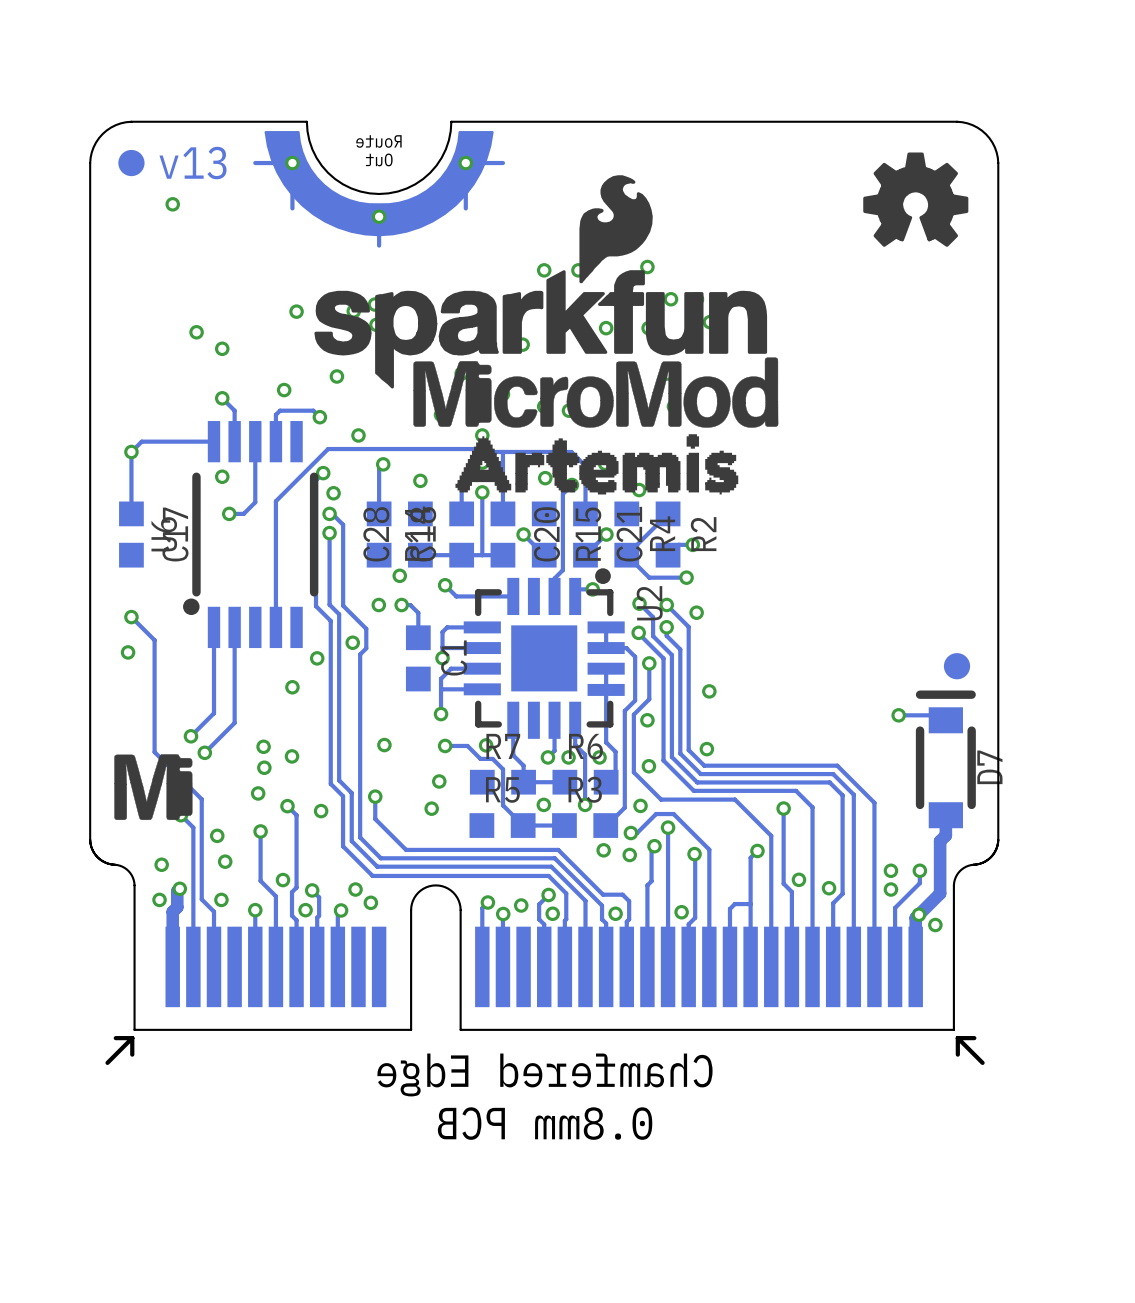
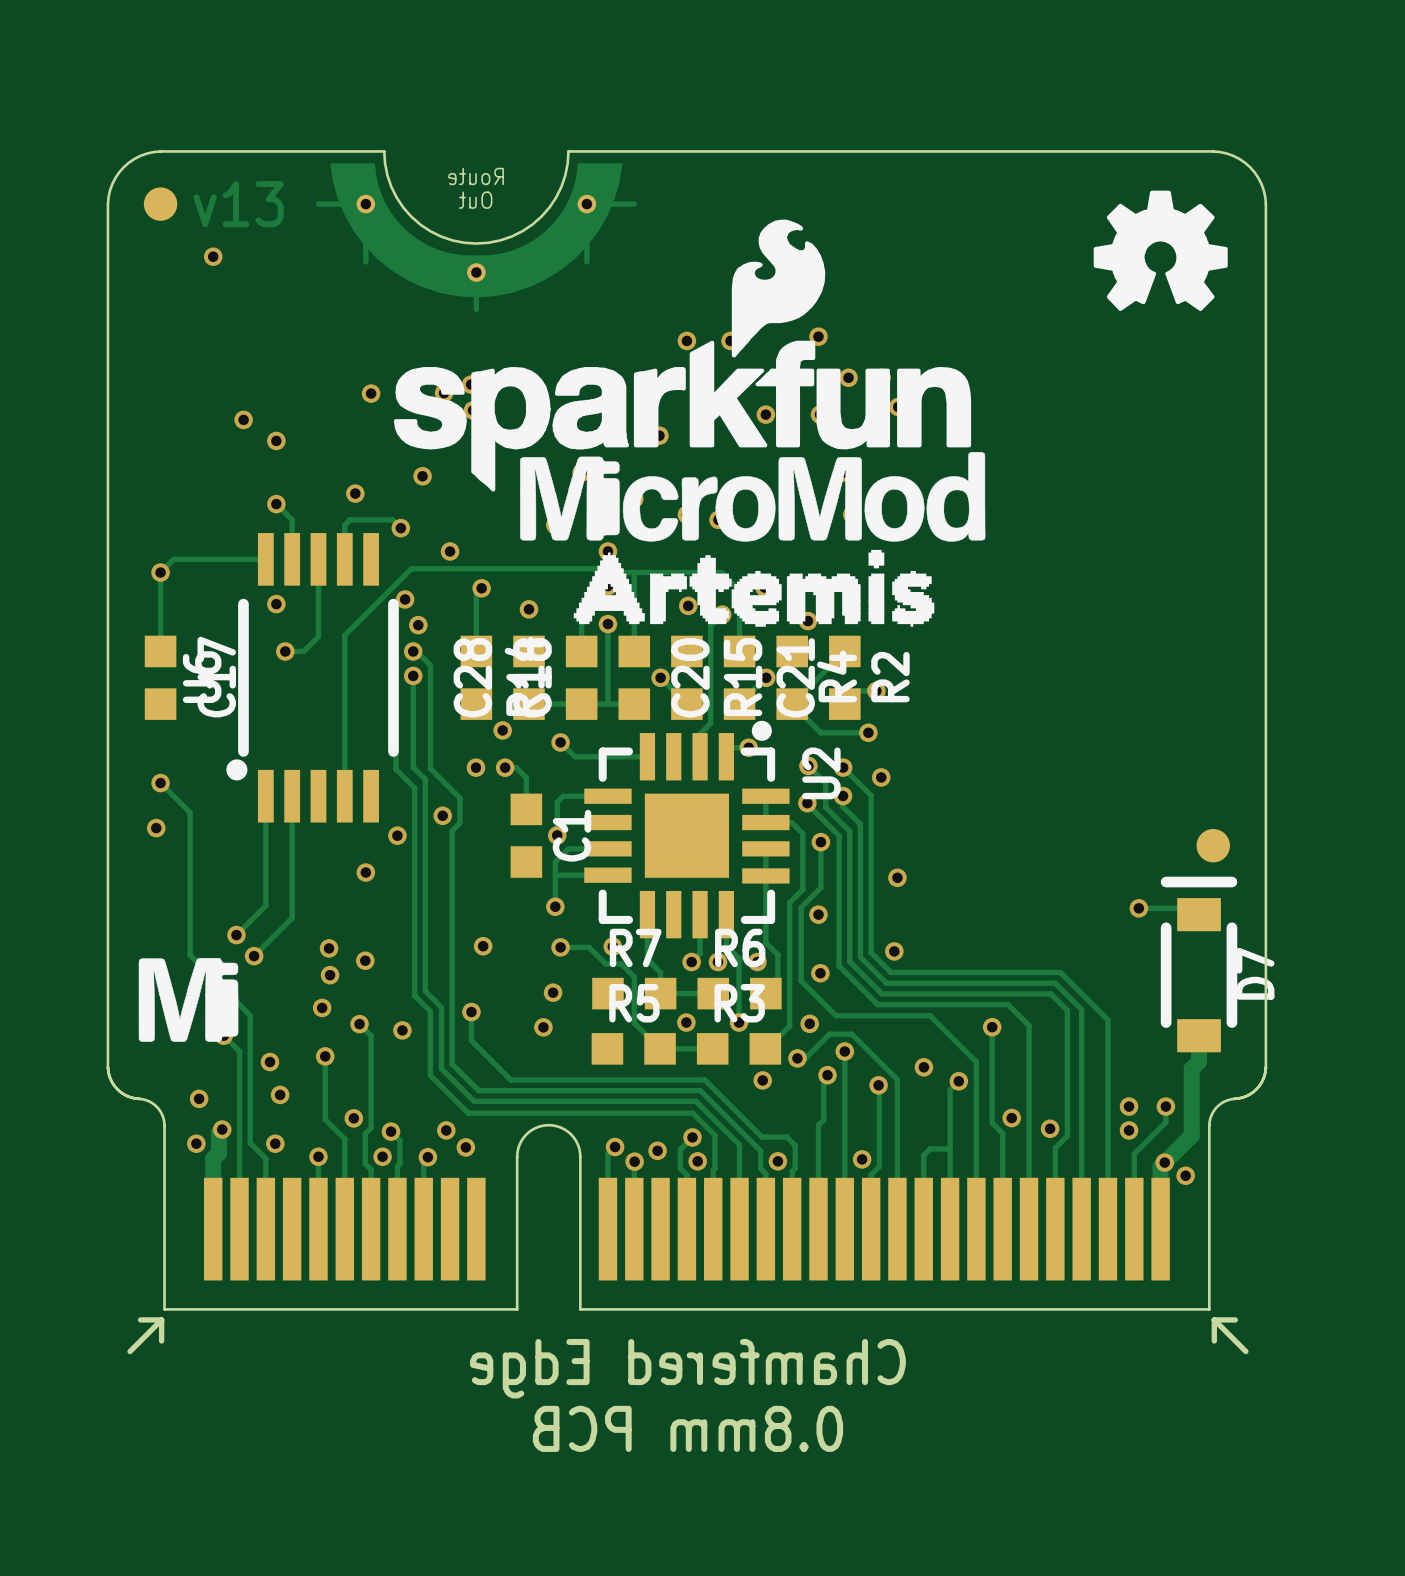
via position: (629, 854) -> (923, 1067)

